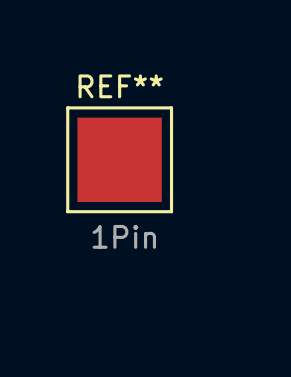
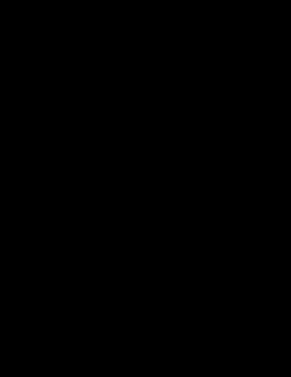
REF**: 1Pin (119, 159) -> none

